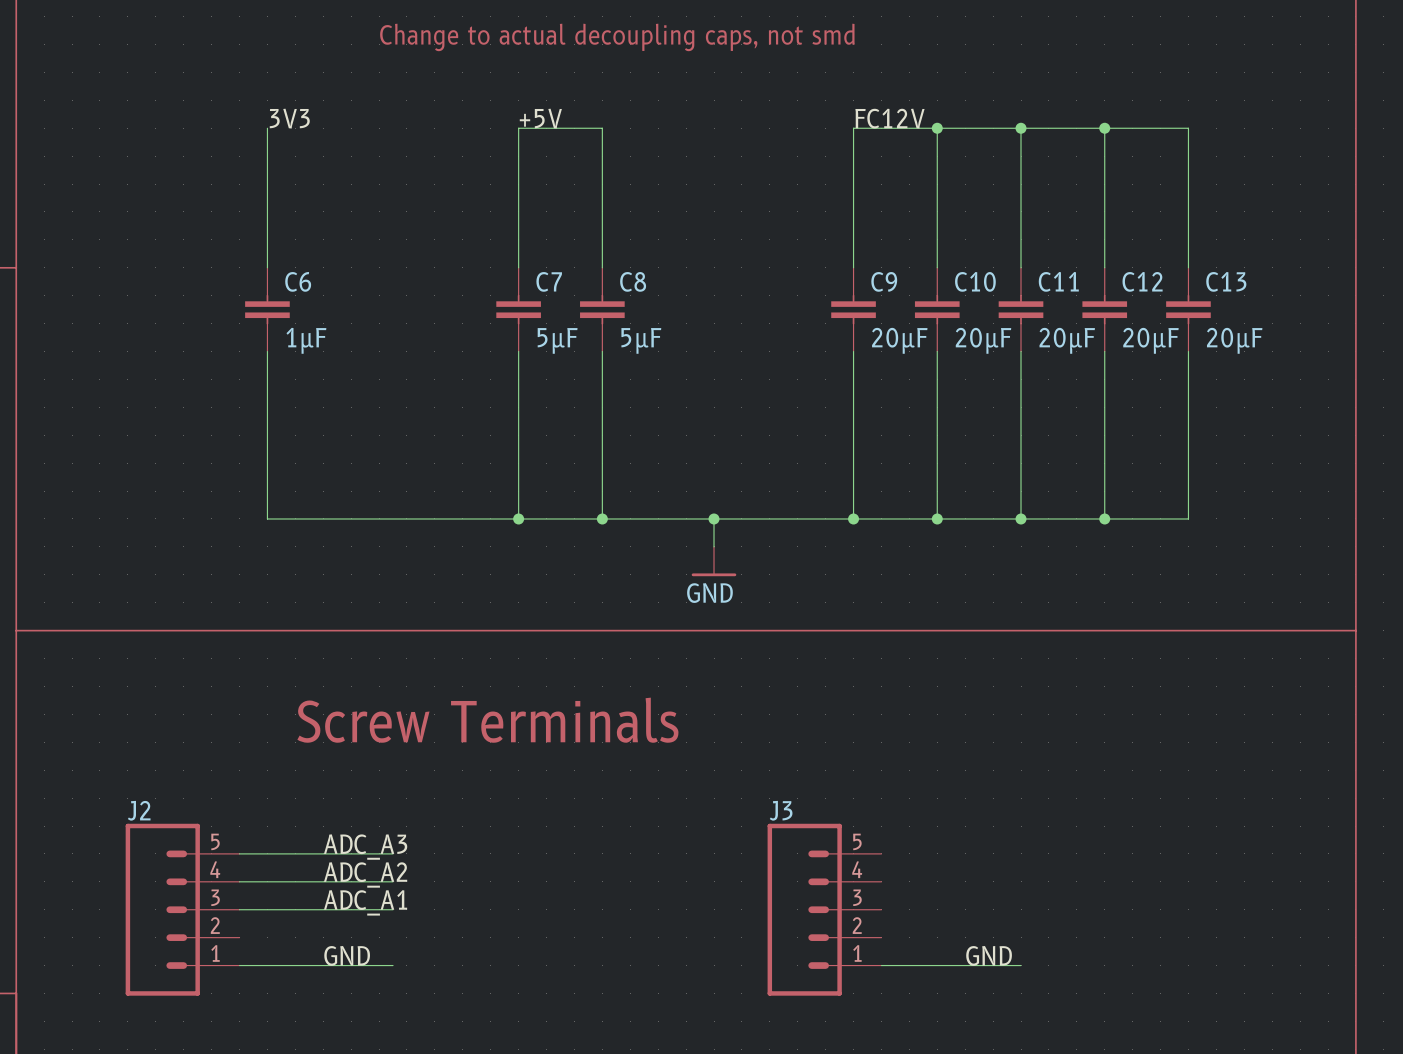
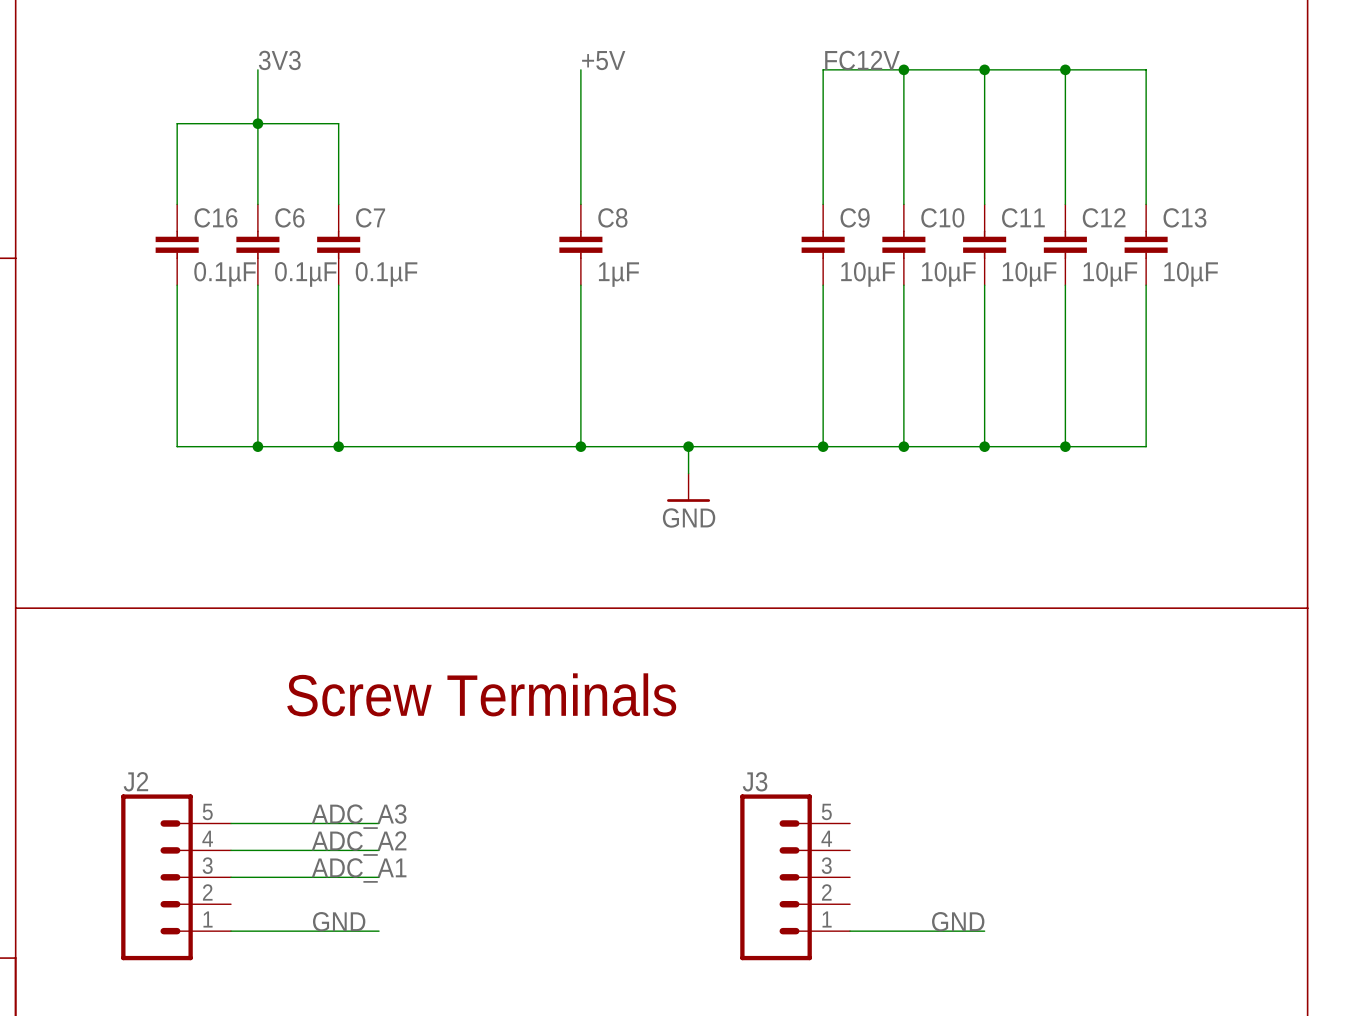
text: Change to actual decoupling caps, not smd (617, 37) -> none
wire: none -> (257, 69) (257, 123)
wire: none -> (903, 69) (903, 123)
junction: none -> (903, 69)
wire: none -> (984, 69) (984, 123)
junction: none -> (984, 69)
wire: none -> (1065, 69) (1065, 123)
junction: none -> (1065, 69)
label position: 3V3 (289, 118) -> 3V3 (279, 60)
label position: +5V (540, 118) -> +5V (603, 60)
label position: FC12V (889, 118) -> FC12V (862, 60)
junction: none -> (257, 123)
wire: (602, 128) (518, 128) (518, 267) -> (580, 123) (580, 69)
wire: (853, 128) (1188, 128) -> (823, 123) (823, 69) (1146, 69) (1146, 123)
junction: (937, 128) -> none
junction: (1021, 128) -> none
junction: (1104, 128) -> none
wire: none -> (177, 204) (177, 123) (338, 123) (338, 204)
C16: none -> 0.1µF (177, 244)
C6 position: (267, 309) -> (257, 244)
C7 position: (518, 309) -> (338, 244)
C8 position: (602, 309) -> (580, 244)
C9 position: (853, 309) -> (823, 244)
C10 position: (937, 309) -> (903, 244)
C11 position: (1021, 309) -> (984, 244)
C12 position: (1104, 309) -> (1065, 244)
C13 position: (1188, 309) -> (1146, 244)
C6 value: 1µF (306, 340) -> 0.1µF (305, 274)
C7 value: 5µF (557, 340) -> 0.1µF (386, 274)
C8 value: 5µF (641, 340) -> 1µF (618, 274)
C9 value: 20µF (899, 340) -> 10µF (868, 274)
C10 value: 20µF (983, 340) -> 10µF (948, 274)
C11 value: 20µF (1067, 340) -> 10µF (1029, 274)
C12 value: 20µF (1150, 340) -> 10µF (1110, 274)
C13 value: 20µF (1234, 340) -> 10µF (1191, 274)
wire: (518, 351) (518, 518) -> (338, 285) (338, 446)
wire: (267, 463) (267, 518) (1188, 518) (1188, 463) -> (177, 285) (177, 446) (1146, 446)
junction: none -> (257, 446)
junction: none -> (338, 446)
wire: (602, 463) (602, 518) -> none
junction: none -> (580, 446)
wire: (853, 463) (853, 518) -> none
junction: none -> (823, 446)
wire: (937, 463) (937, 518) -> none
junction: none -> (903, 446)
wire: (1021, 463) (1021, 518) -> none
junction: none -> (984, 446)
wire: (1104, 463) (1104, 518) -> none
junction: none -> (1065, 446)
junction: (518, 518) -> none
junction: (602, 518) -> none
wire: (714, 518) (714, 546) -> (688, 446) (688, 473)
junction position: (714, 518) -> (688, 446)
junction: (853, 518) -> none
junction: (937, 518) -> none
junction: (1021, 518) -> none
junction: (1104, 518) -> none
power symbol position: GND (714, 561) -> GND (688, 487)

